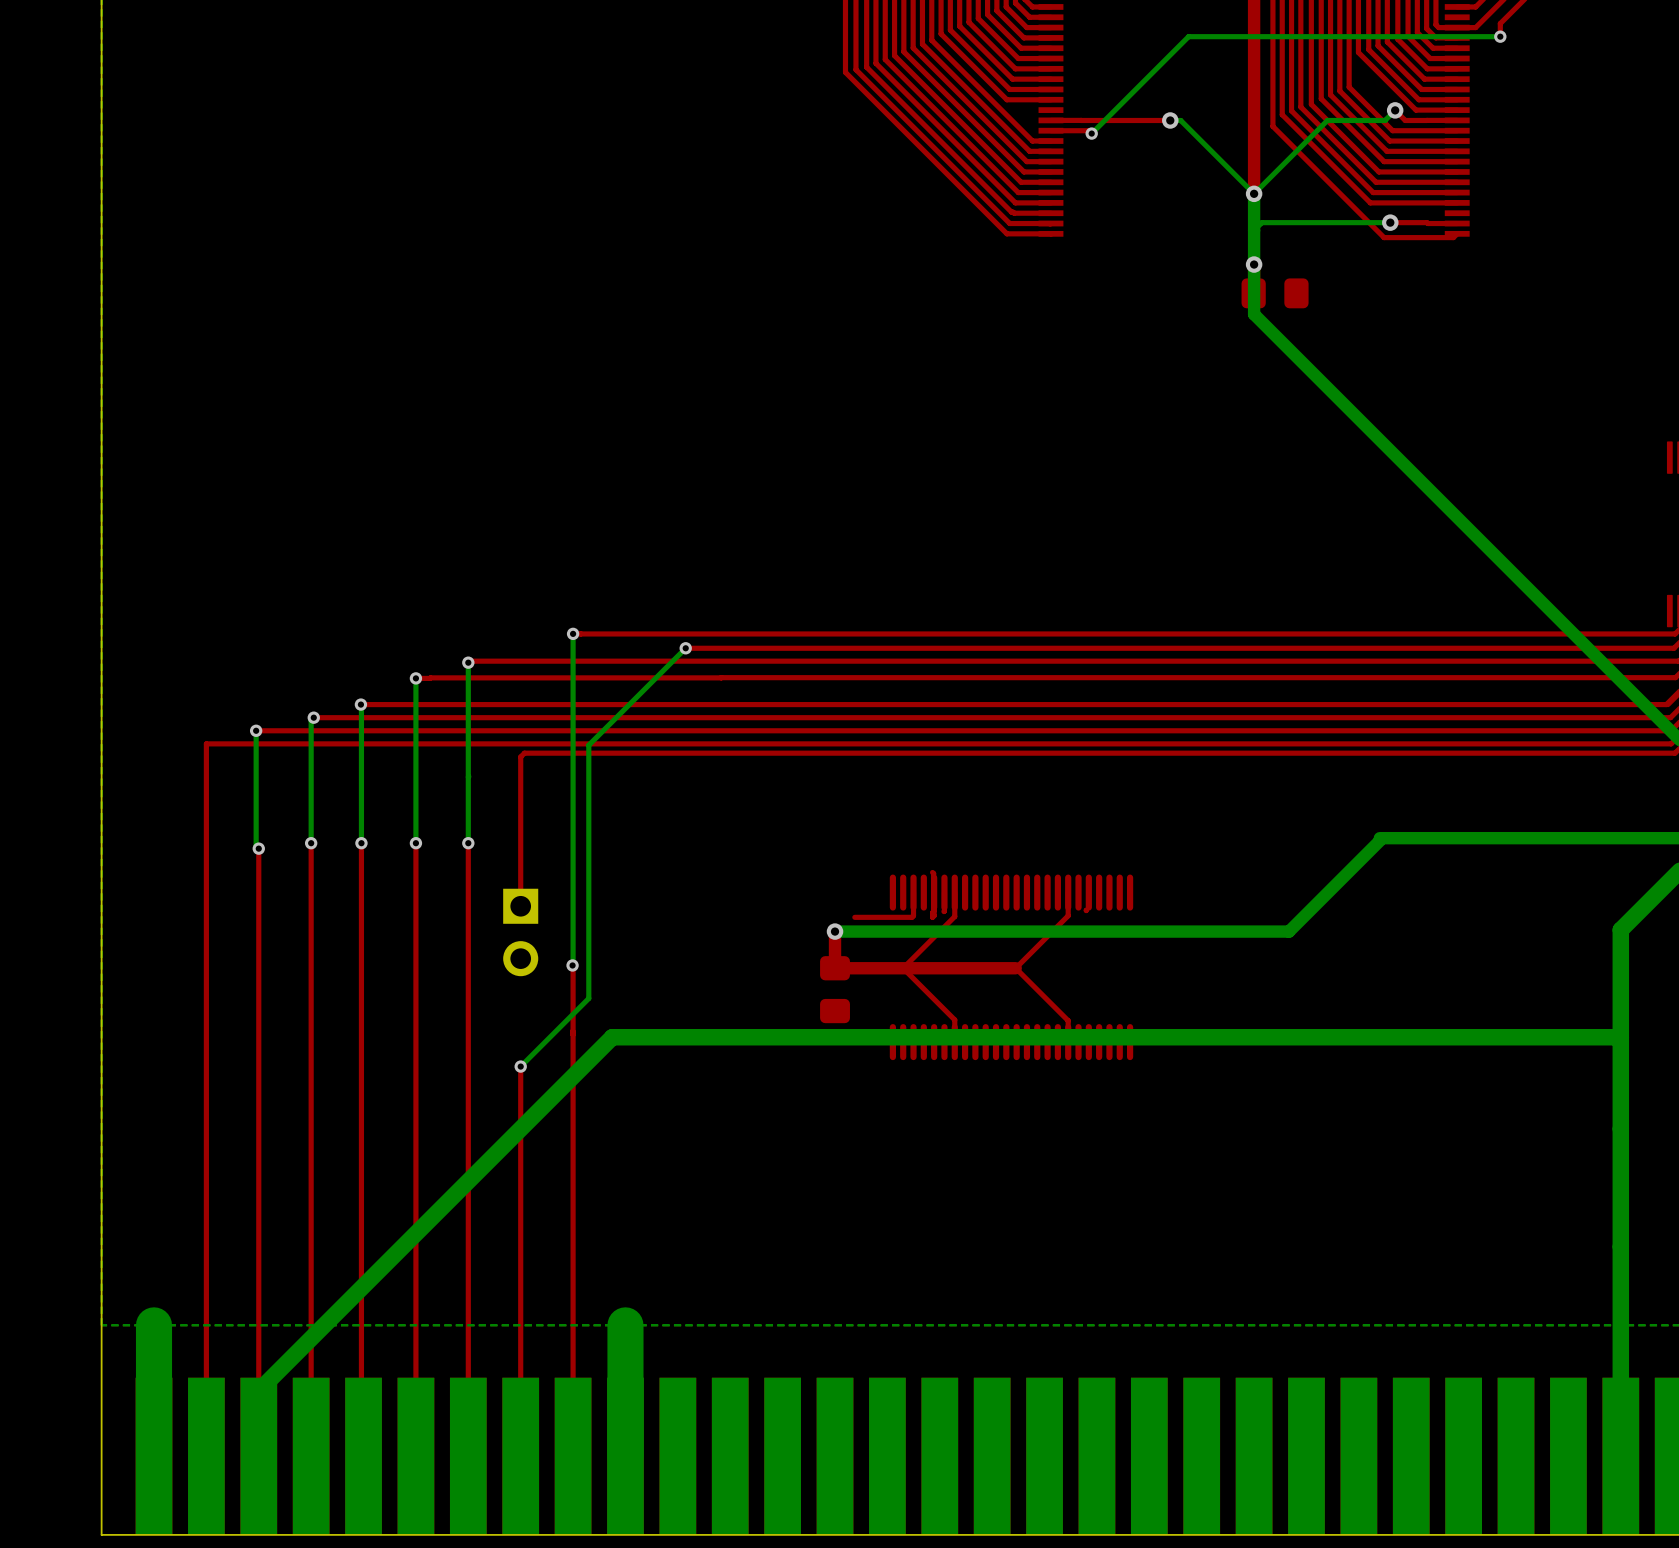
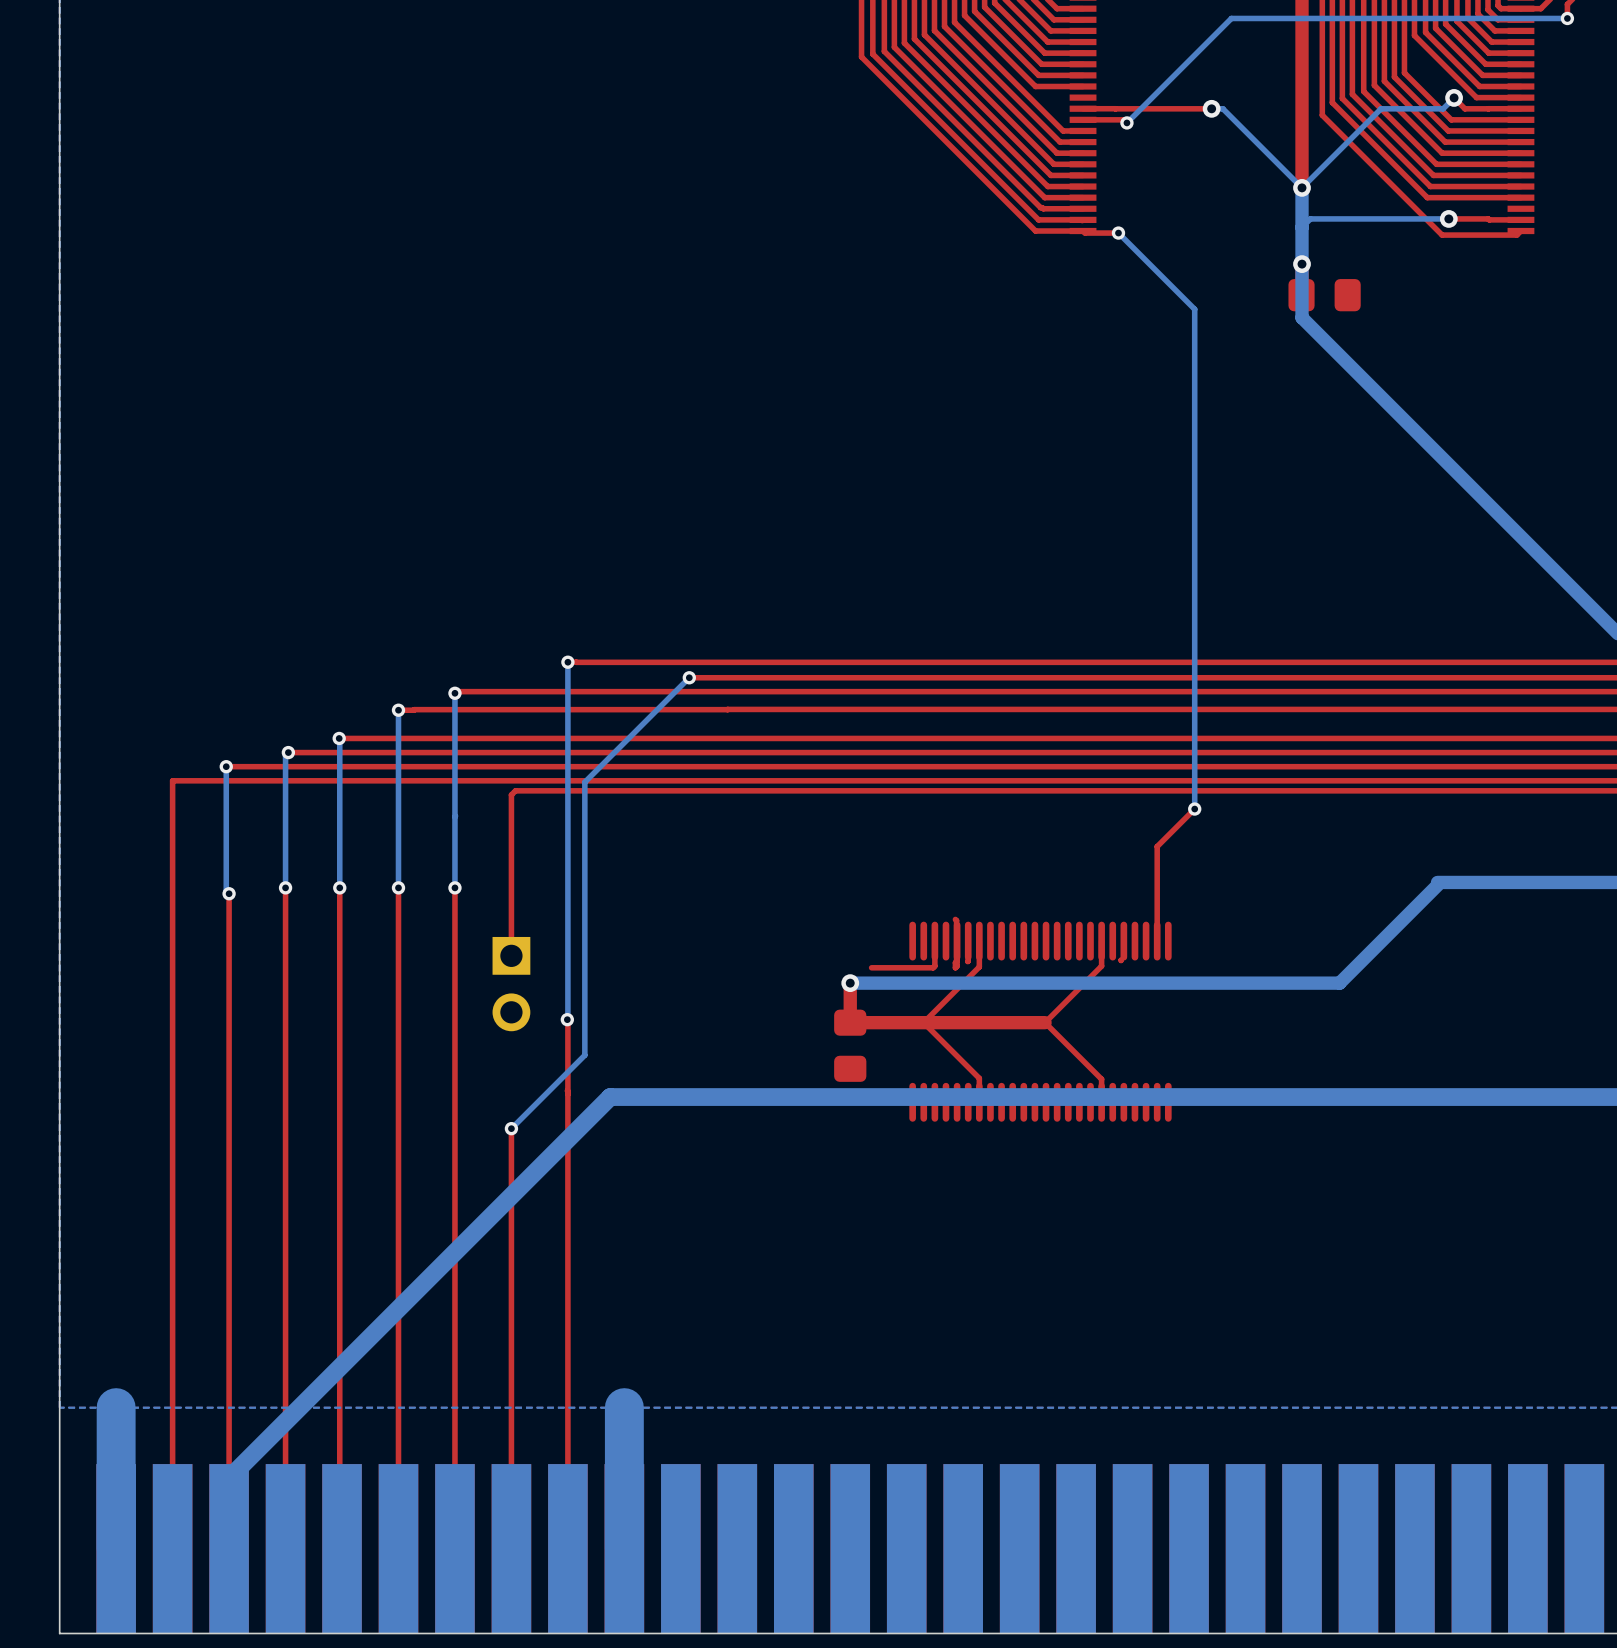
top track: none -> (1083, 231) (1085, 233) (1118, 233)
bottom track: none -> (1118, 233) (1194, 309) (1194, 809)
via: none -> (1118, 233)
top track: none -> (1194, 809) (1157, 846) (1157, 941)
via: none -> (1194, 809)

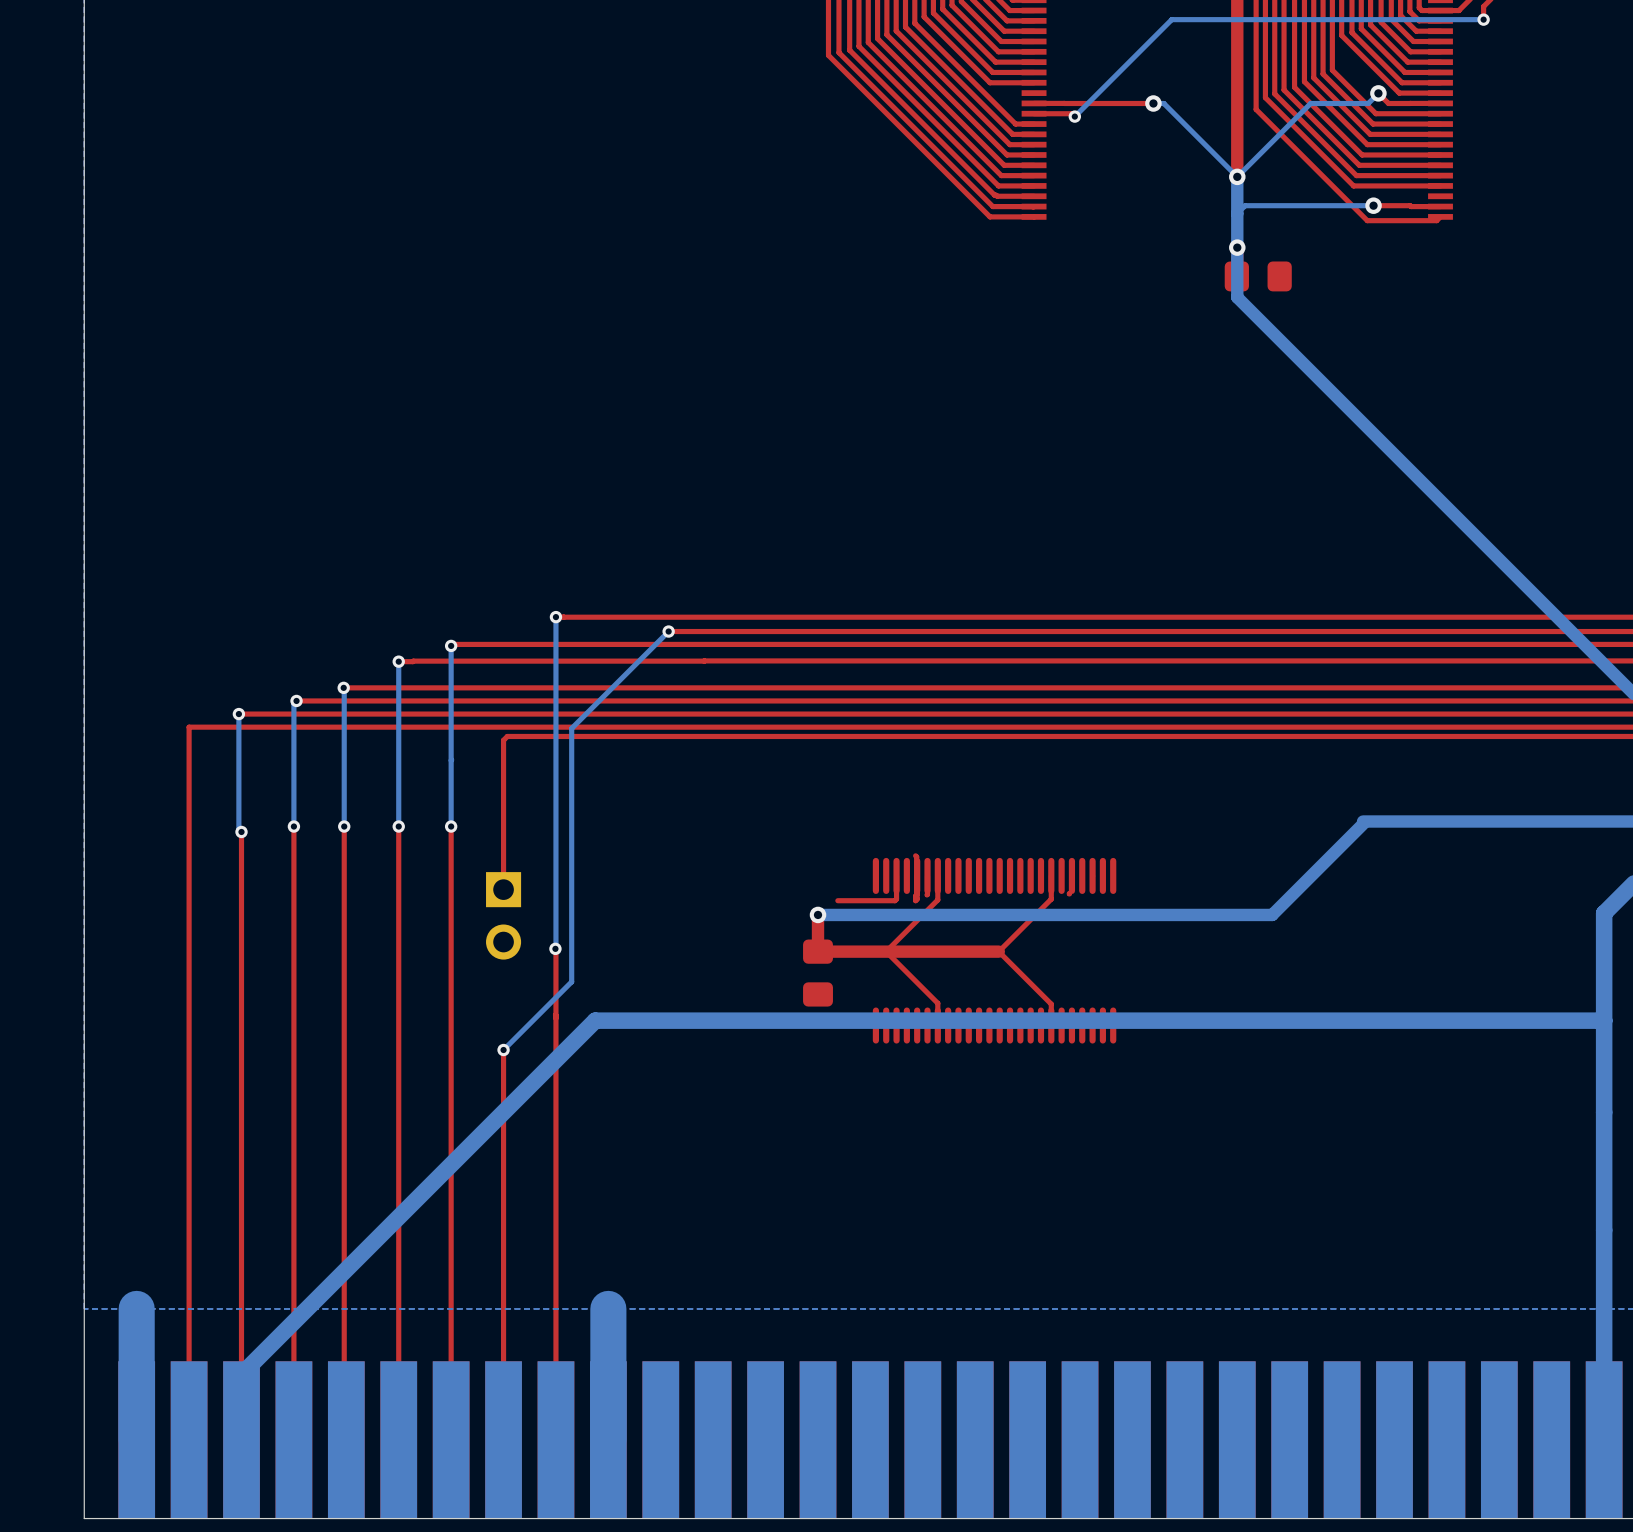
top track: (1083, 231) (1085, 233) (1118, 233) -> none
bottom track: (1118, 233) (1194, 309) (1194, 809) -> none
via: (1118, 233) -> none
top track: (1194, 809) (1157, 846) (1157, 941) -> none
via: (1194, 809) -> none

